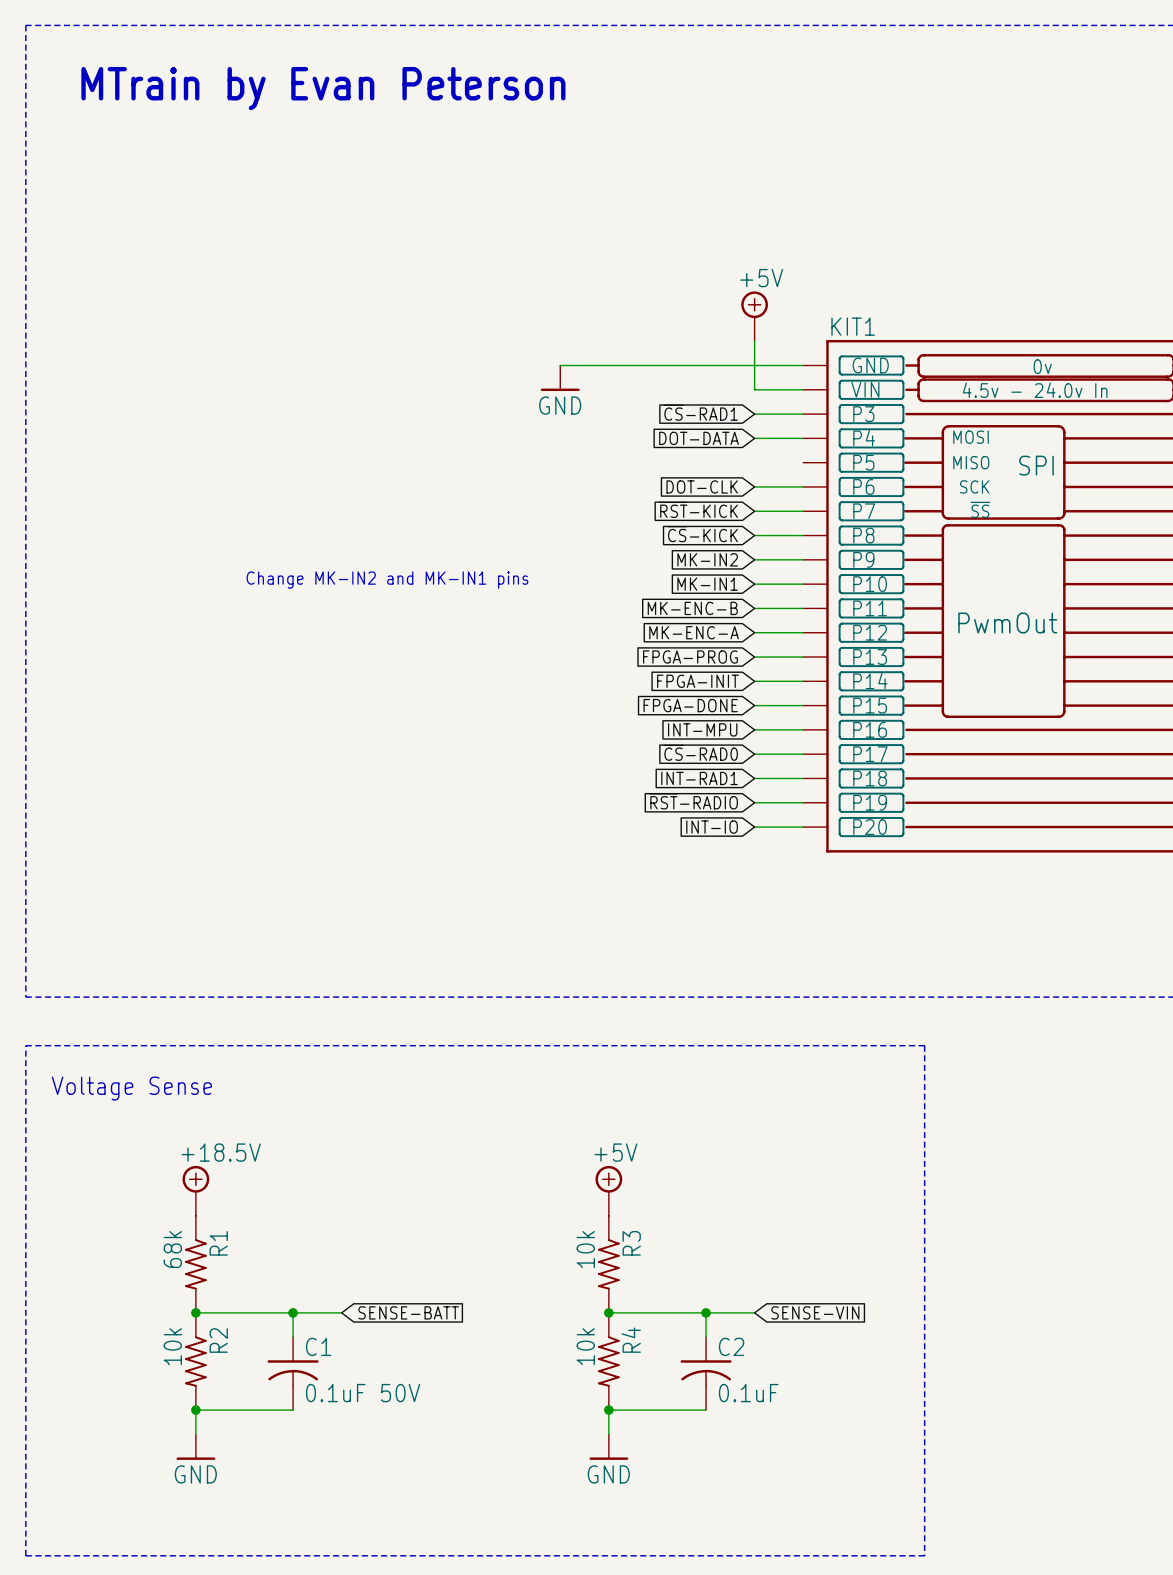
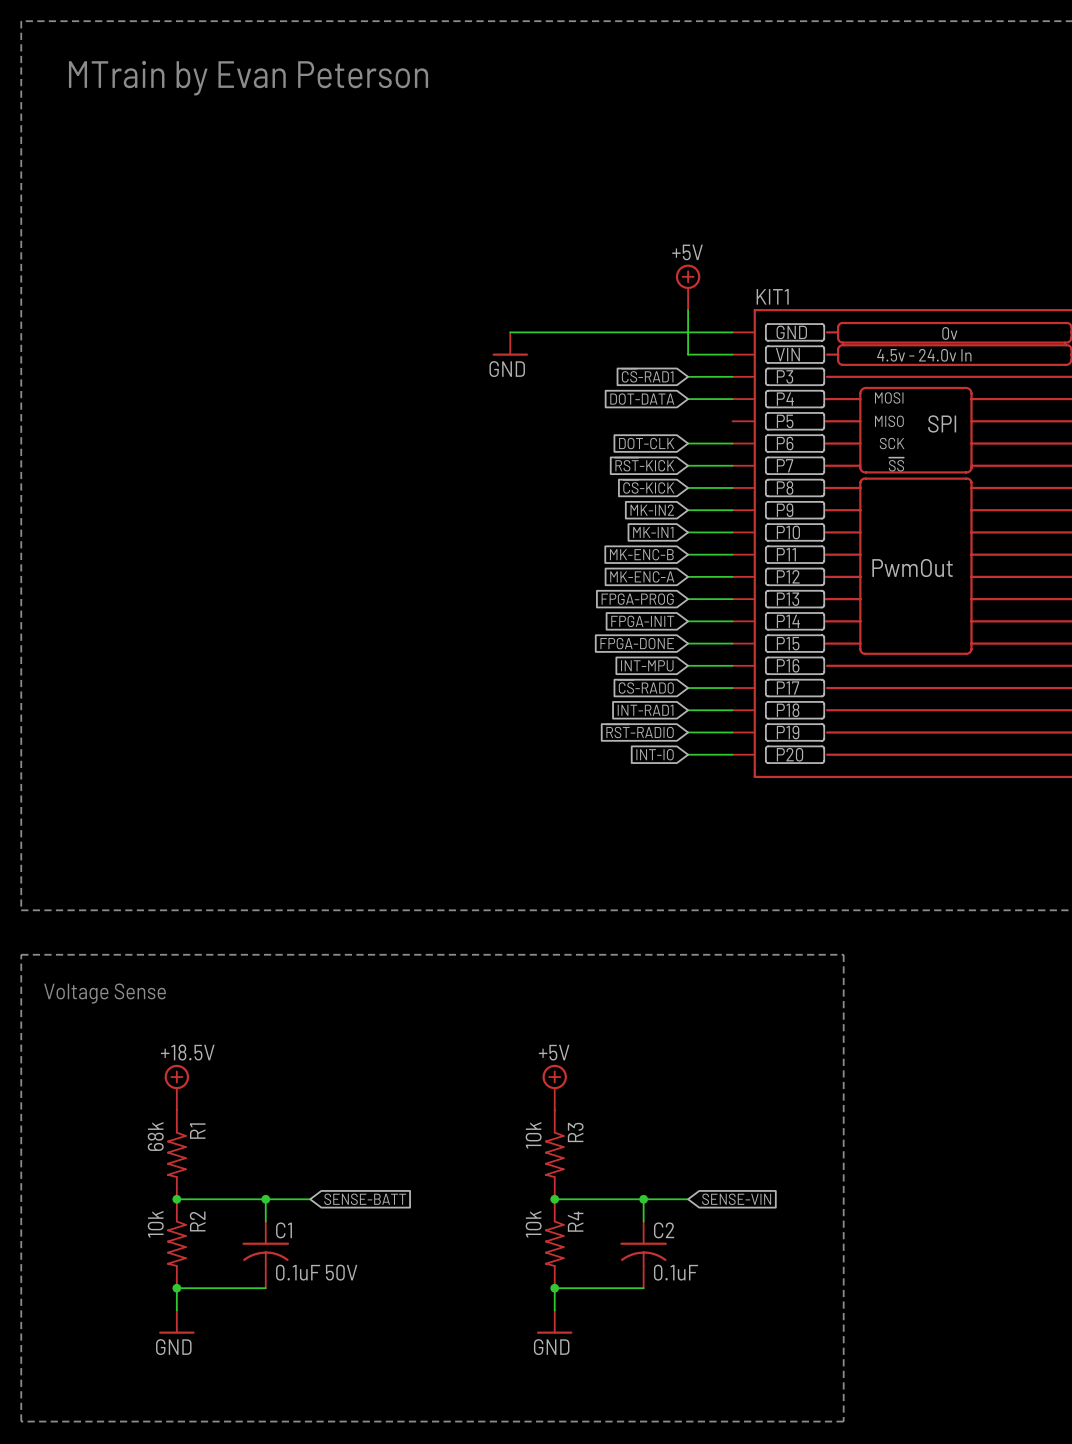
text: Change MK-IN2 and MK-IN1 pins (387, 580) -> none

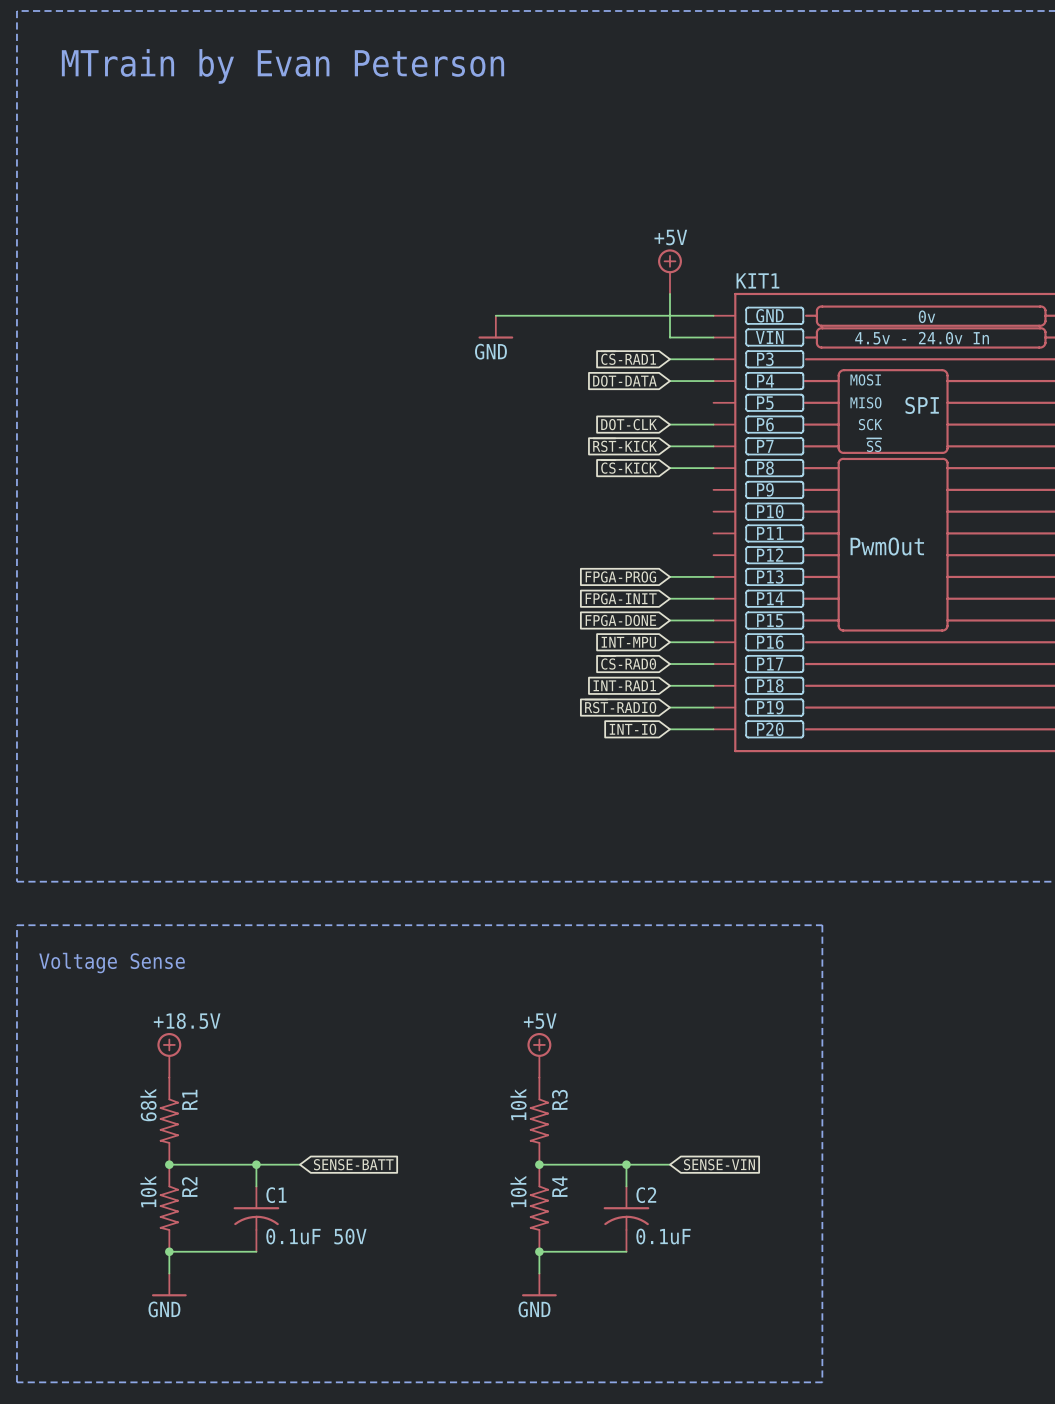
global label: MK-IN2 (652, 510) -> none
wire: (688, 510) (732, 510) -> none
global label: MK-IN1 (653, 532) -> none
wire: (688, 532) (732, 532) -> none
global label: MK-ENC-B (641, 554) -> none
wire: (688, 554) (732, 554) -> none
global label: MK-ENC-A (642, 576) -> none
wire: (688, 576) (732, 576) -> none

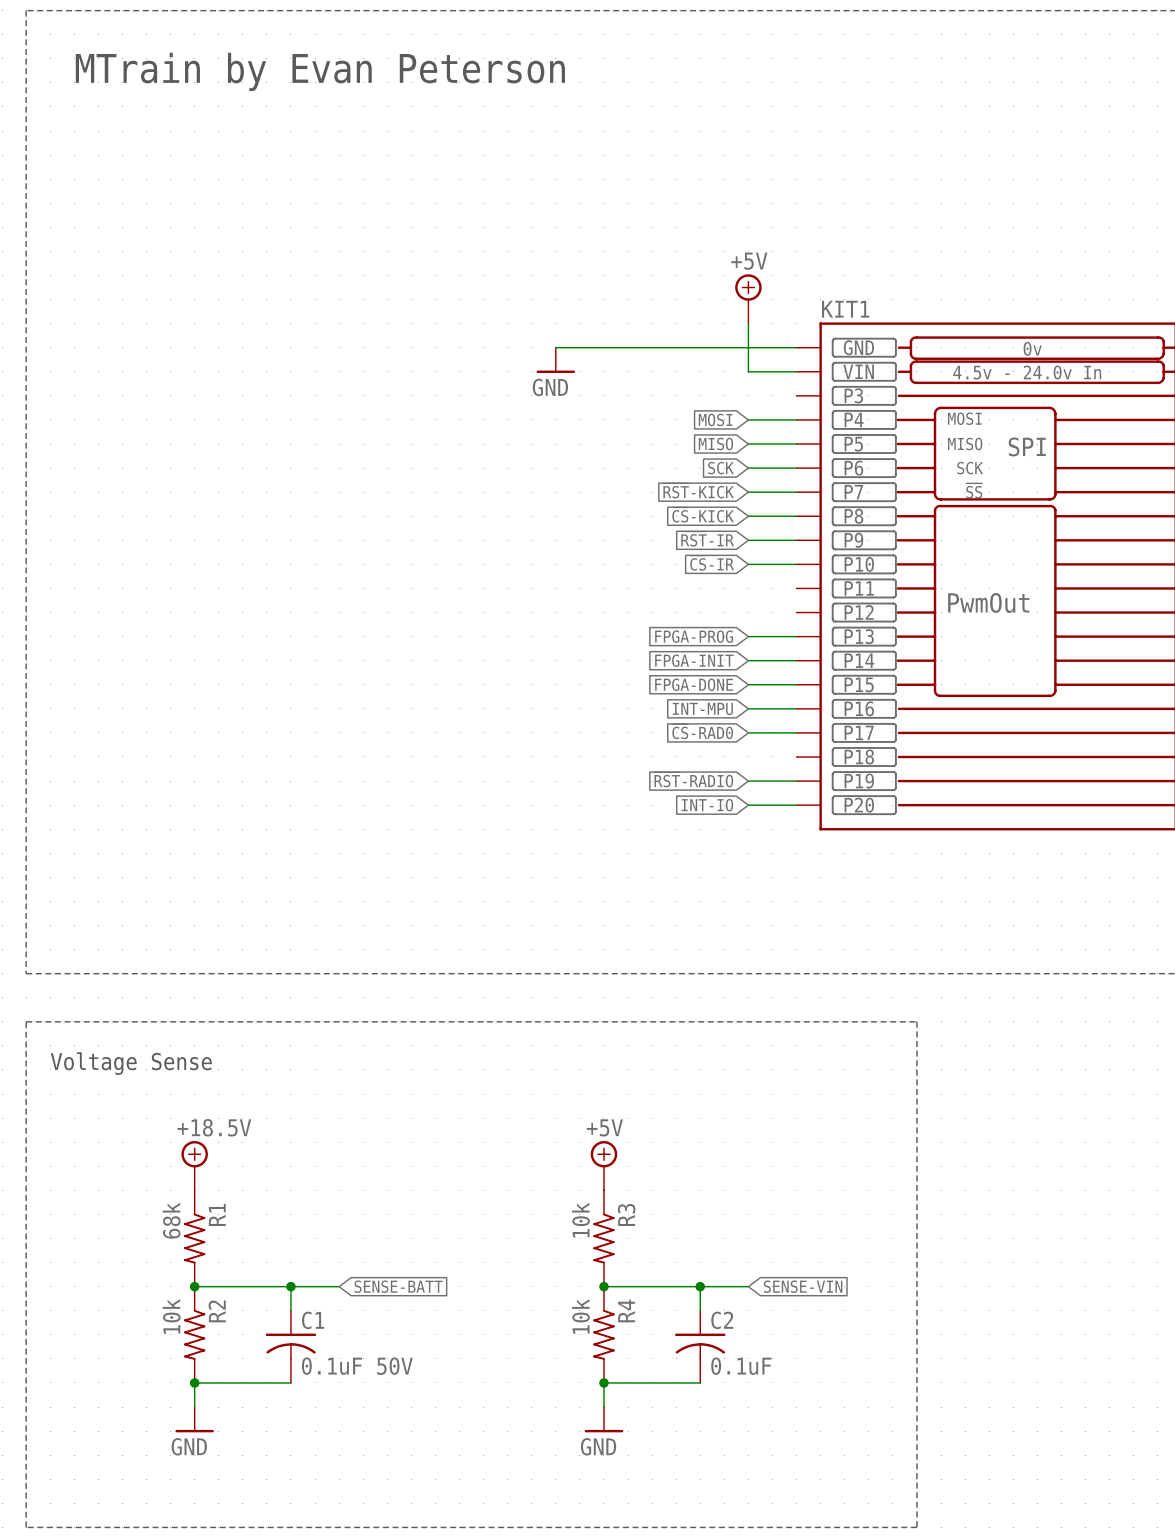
global label: ~{CS}-RAD1 (628, 358) -> none
wire: (670, 359) (713, 359) -> (748, 444) (796, 444)
global label: DOT-DATA (624, 381) -> MOSI (715, 419)
global label: none -> MISO (715, 444)
global label: DOT-CLK (629, 424) -> SCK (721, 468)
global label: none -> ~{RST}-IR (707, 539)
wire: none -> (748, 540) (796, 540)
global label: none -> ~{CS}-IR (712, 563)
global label: INT-RAD1 (624, 685) -> none
wire: (670, 685) (713, 685) -> (748, 564) (796, 564)

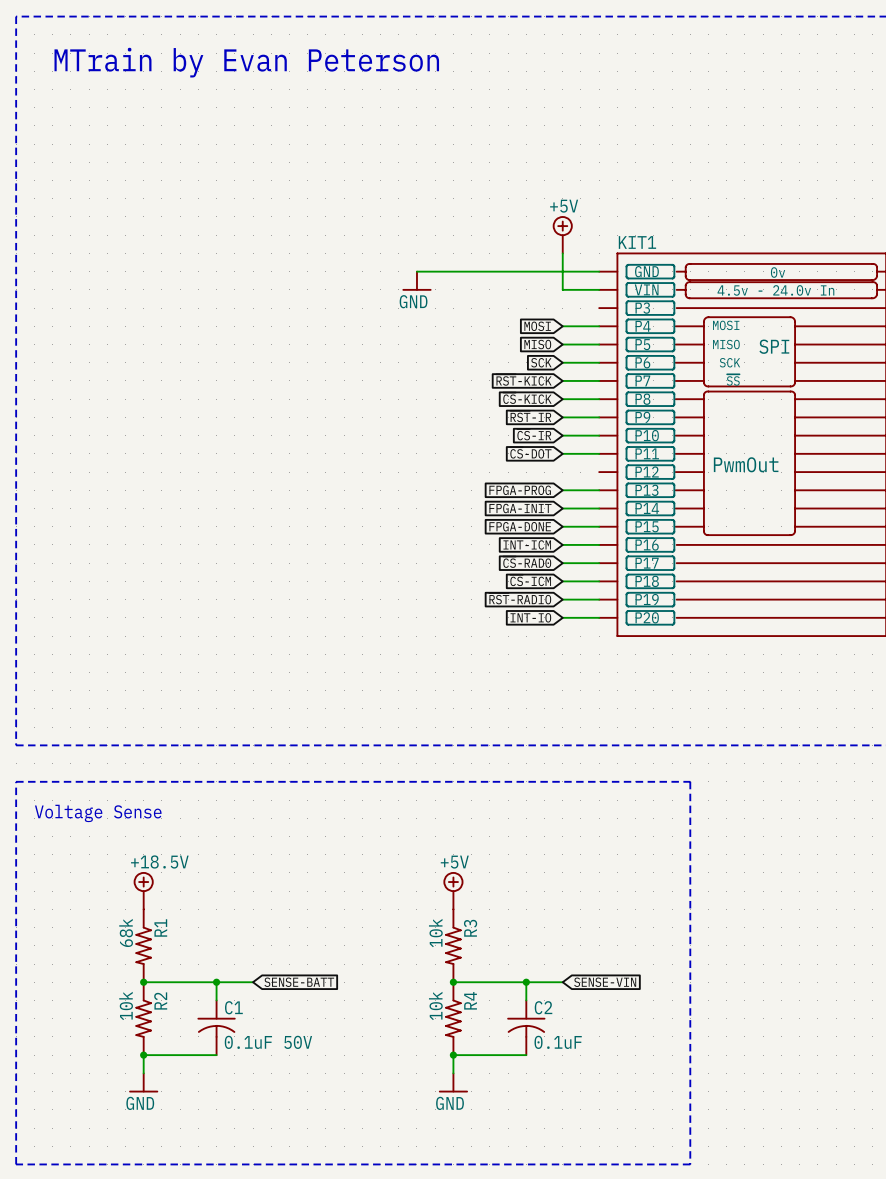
global label: none -> ~{CS}-DOT (530, 452)
wire: none -> (562, 453) (599, 453)
global label: INT-MPU (702, 708) -> INT-ICM (527, 544)
global label: none -> ~{CS}-ICM (530, 580)
wire: none -> (562, 581) (599, 581)

